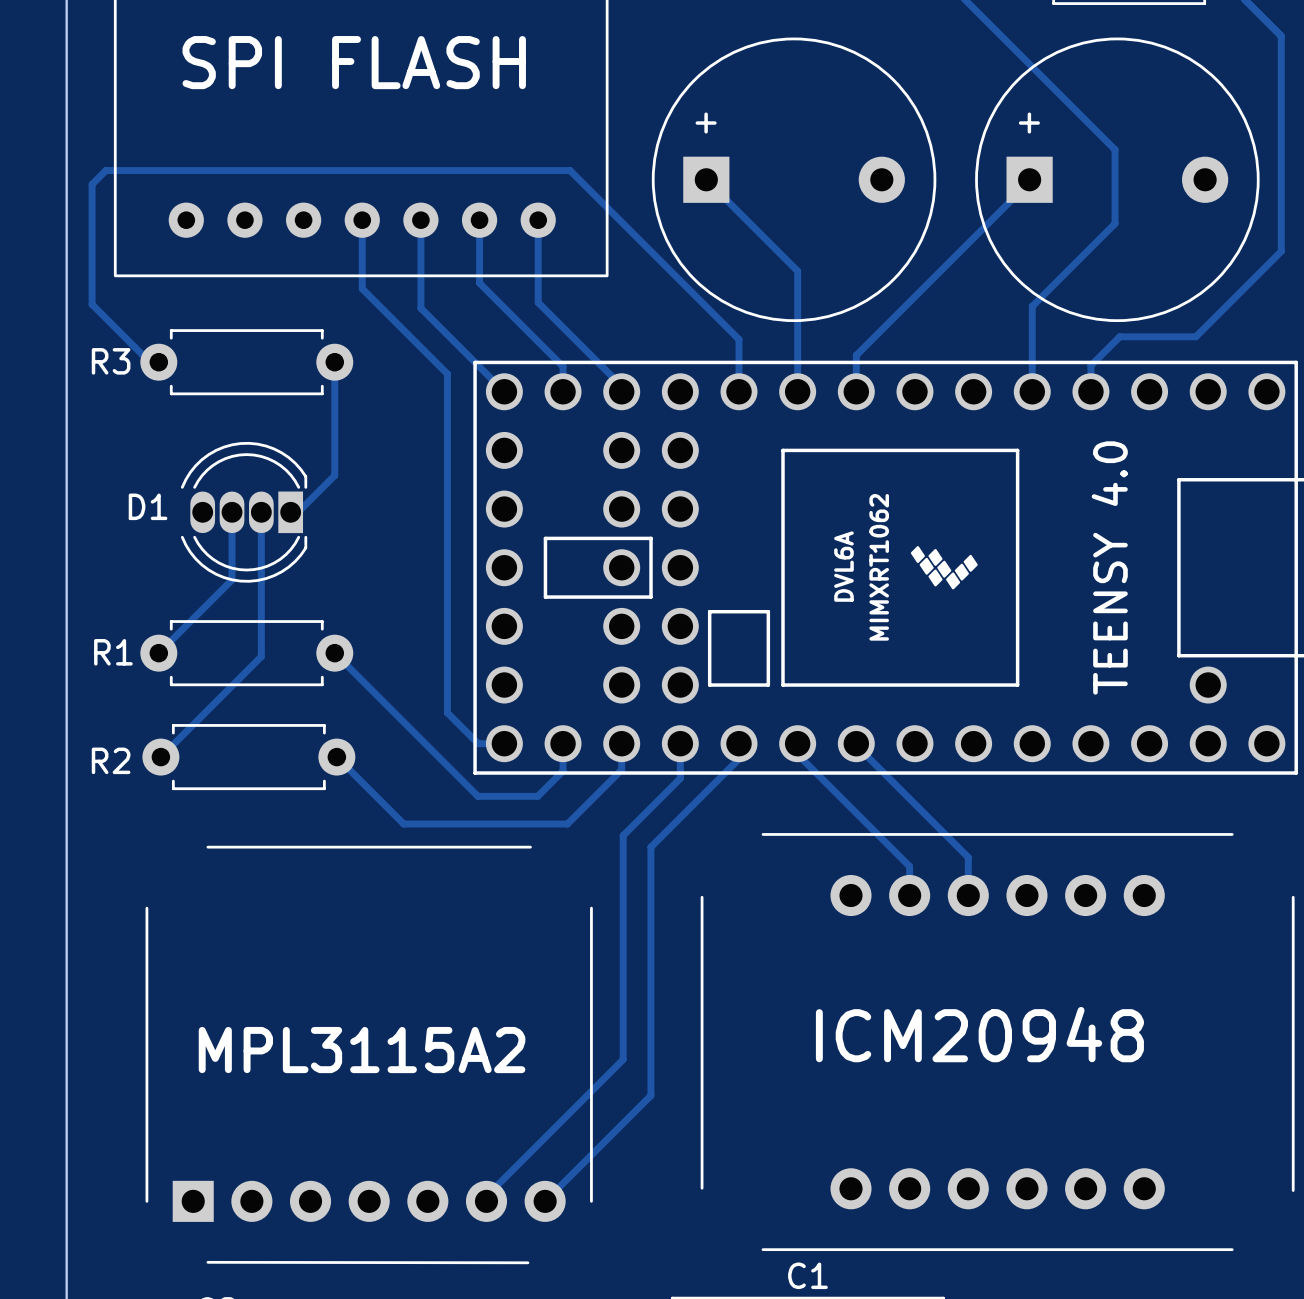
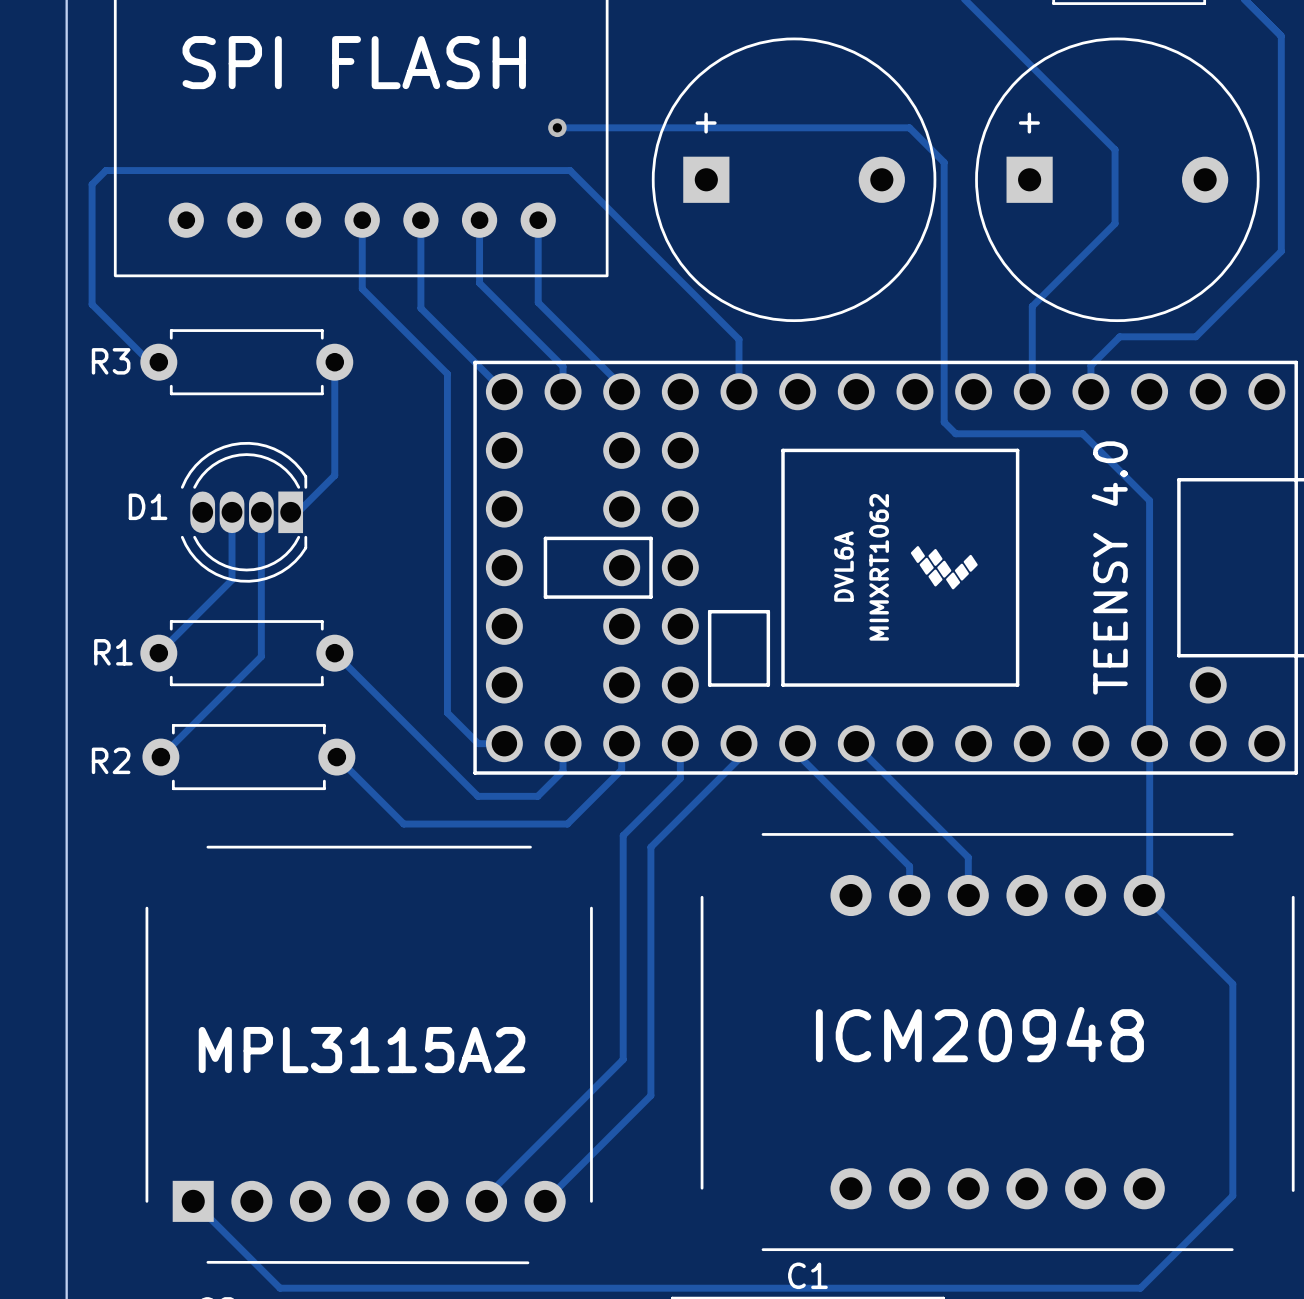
track: none -> (557, 127) (909, 127) (944, 162) (944, 422) (955, 433) (1082, 433) (1149, 500) (1149, 743)
via: none -> (557, 127)
track: (706, 179) (797, 271) (797, 391) -> none
track: (1029, 179) (1029, 182) (856, 355) (856, 391) -> none
track: none -> (1149, 743) (1149, 890) (1144, 895) (1232, 984) (1232, 1195) (1140, 1288) (280, 1288) (193, 1201)

